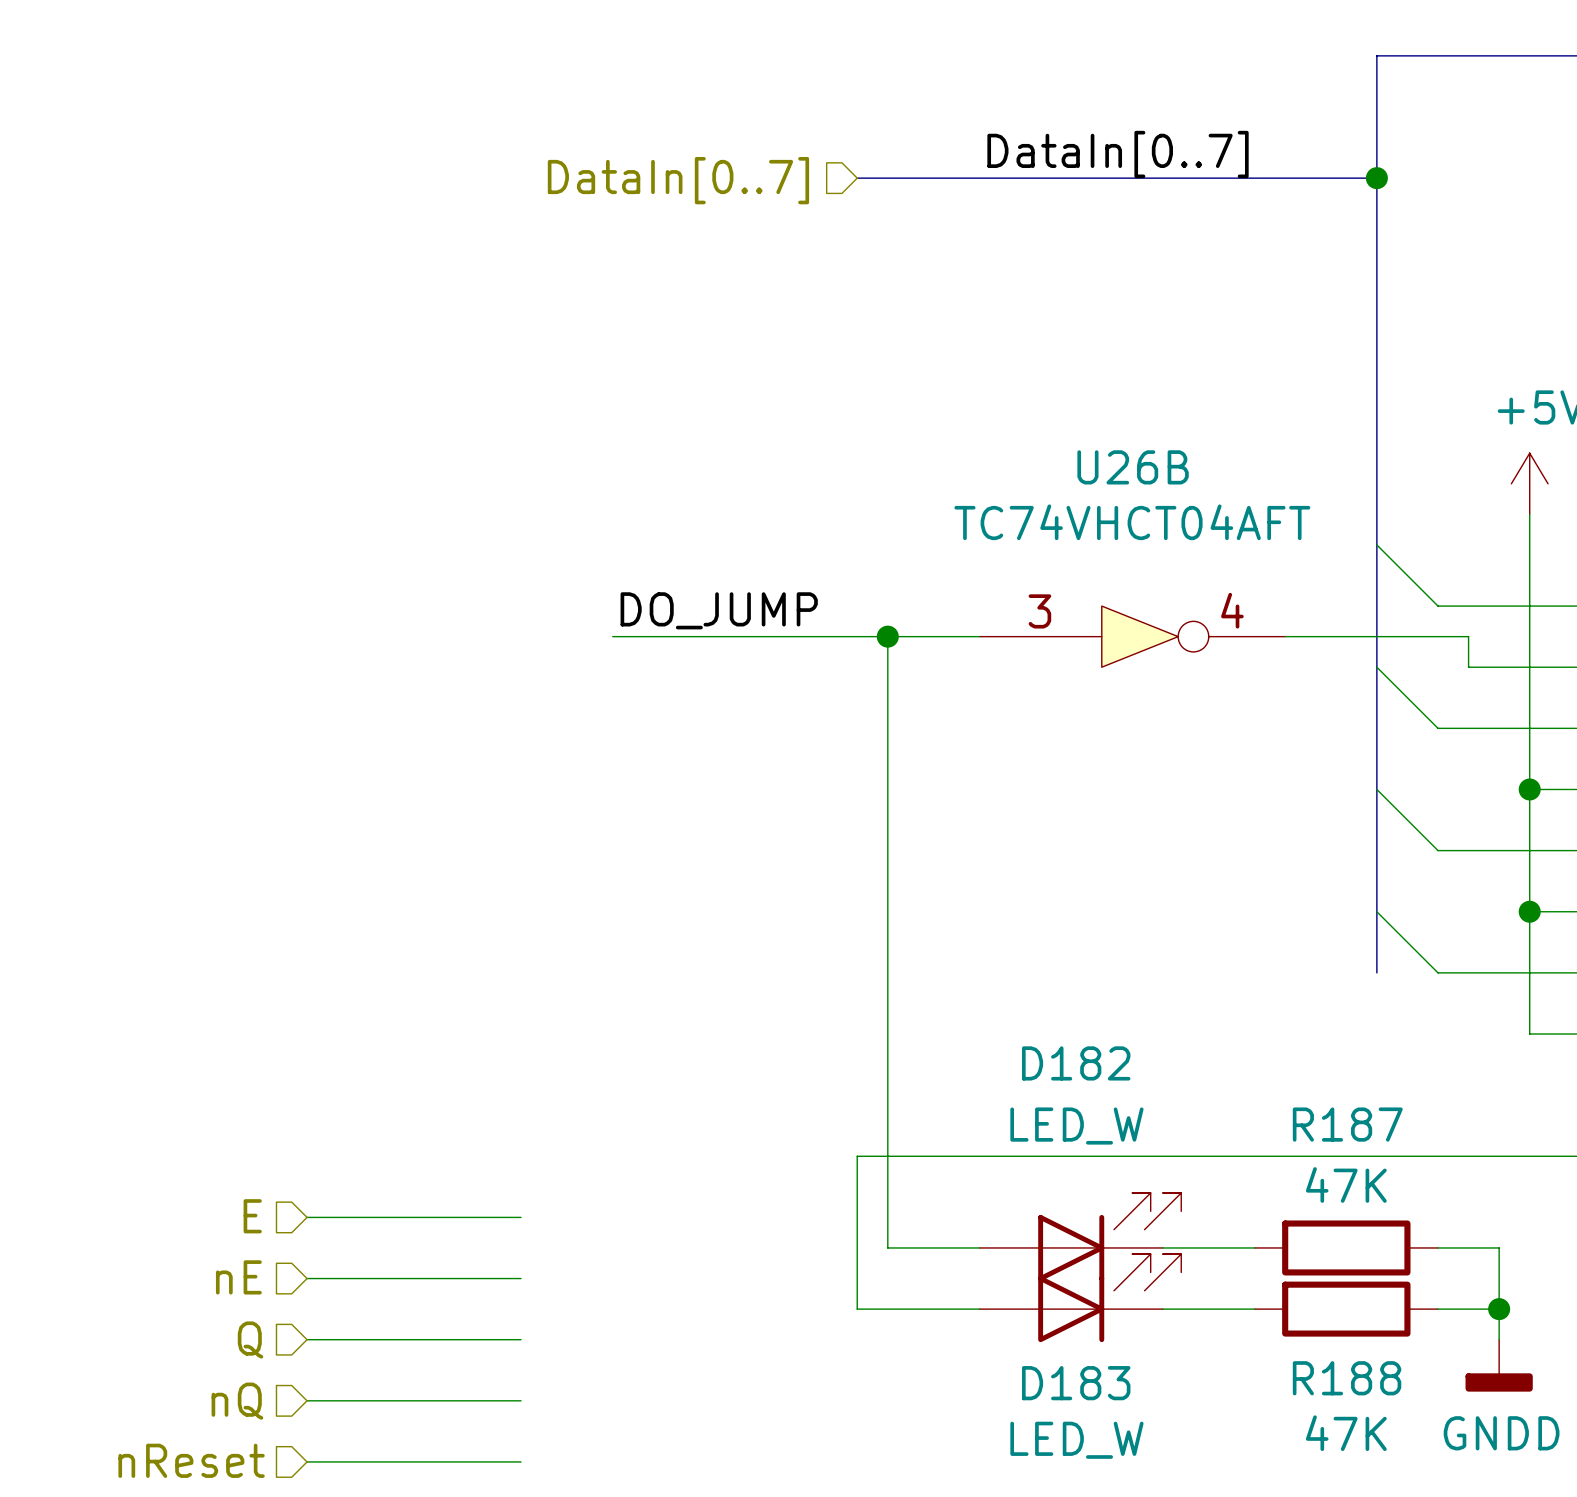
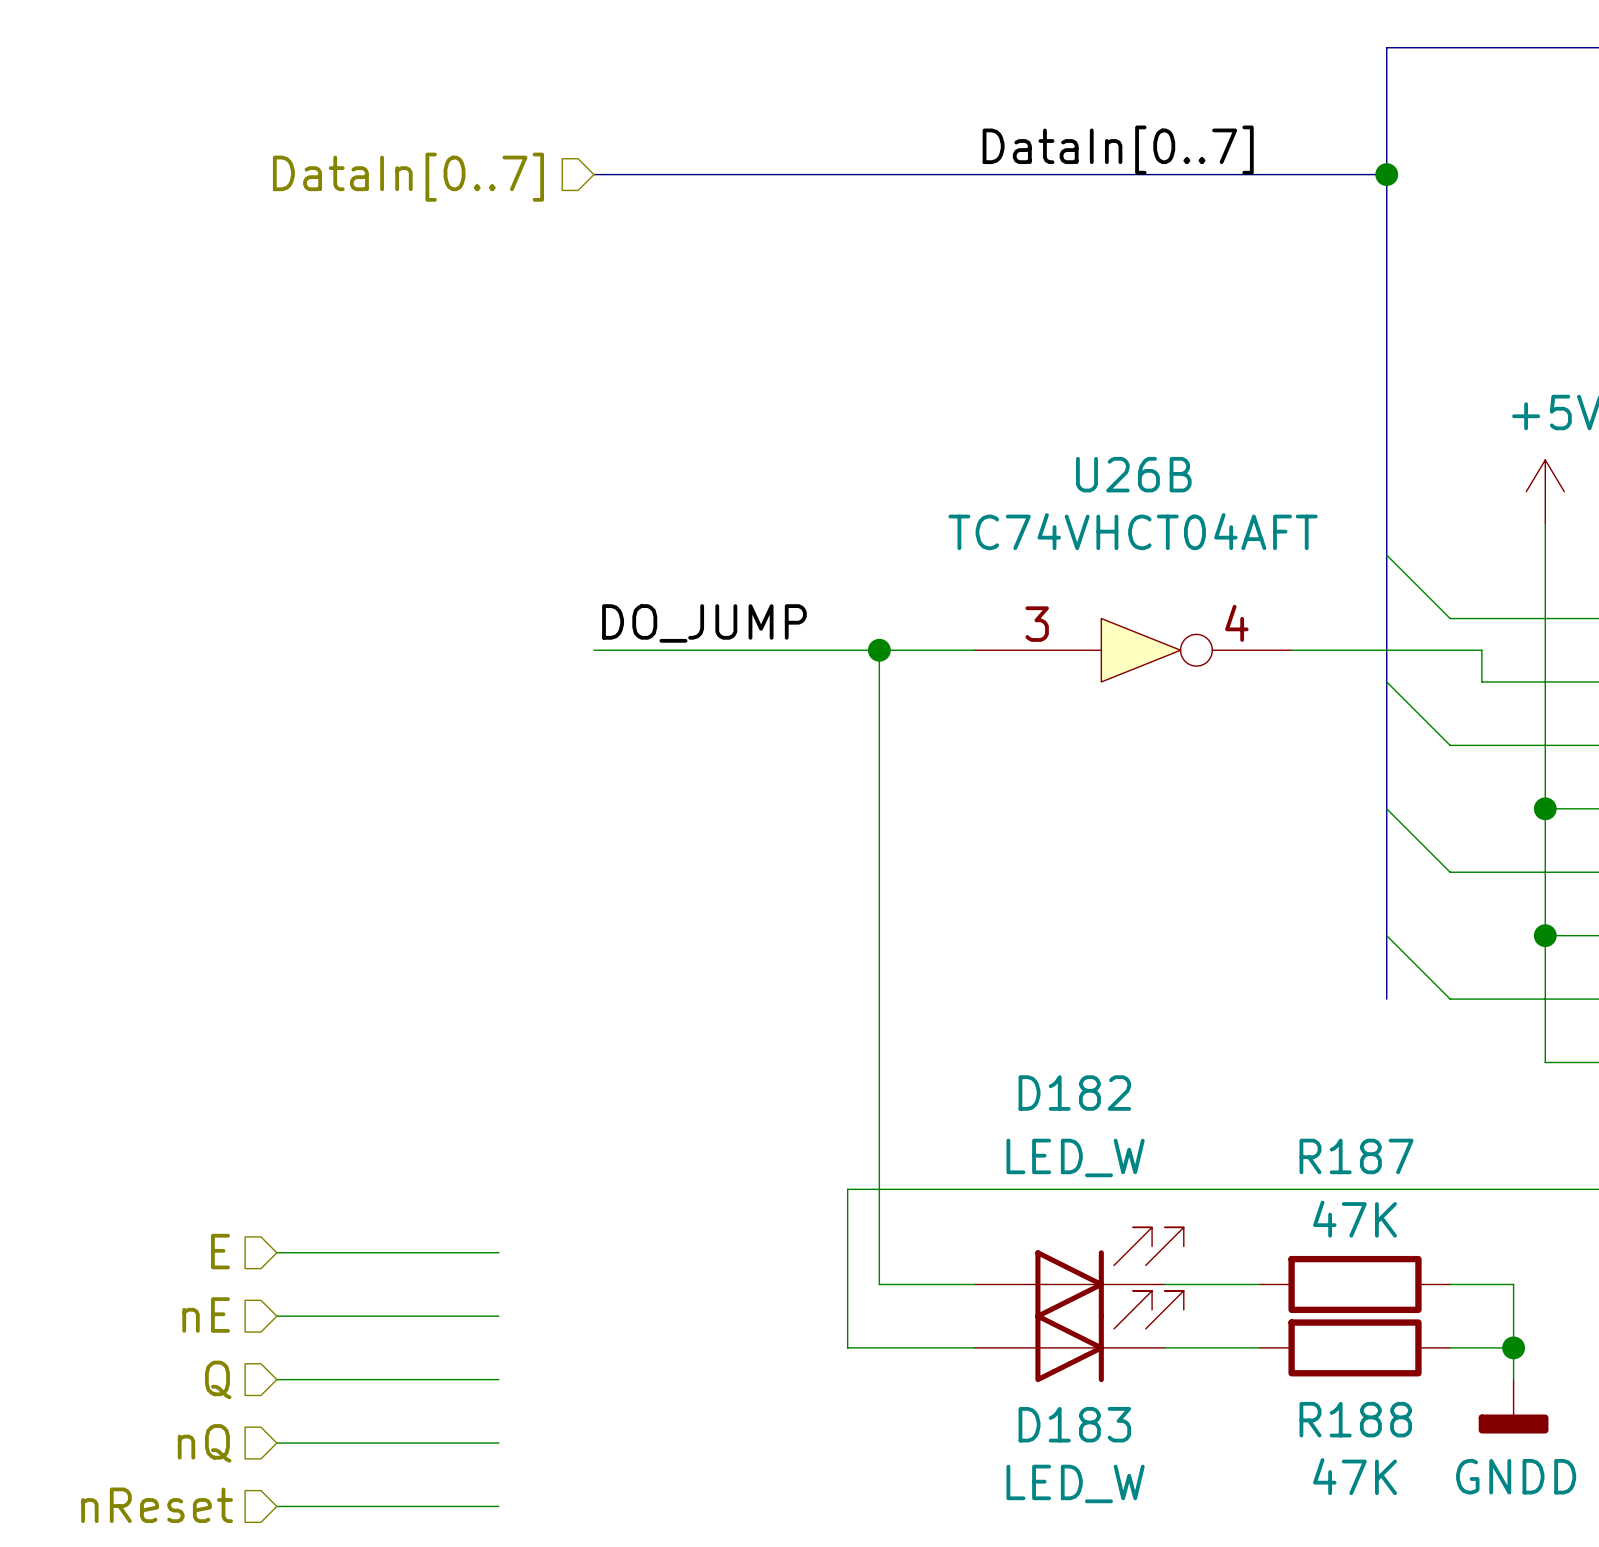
bus: none -> (593, 174) (847, 174)
hierarchical label position: DataIn[0..7] (678, 180) -> DataIn[0..7] (408, 177)

